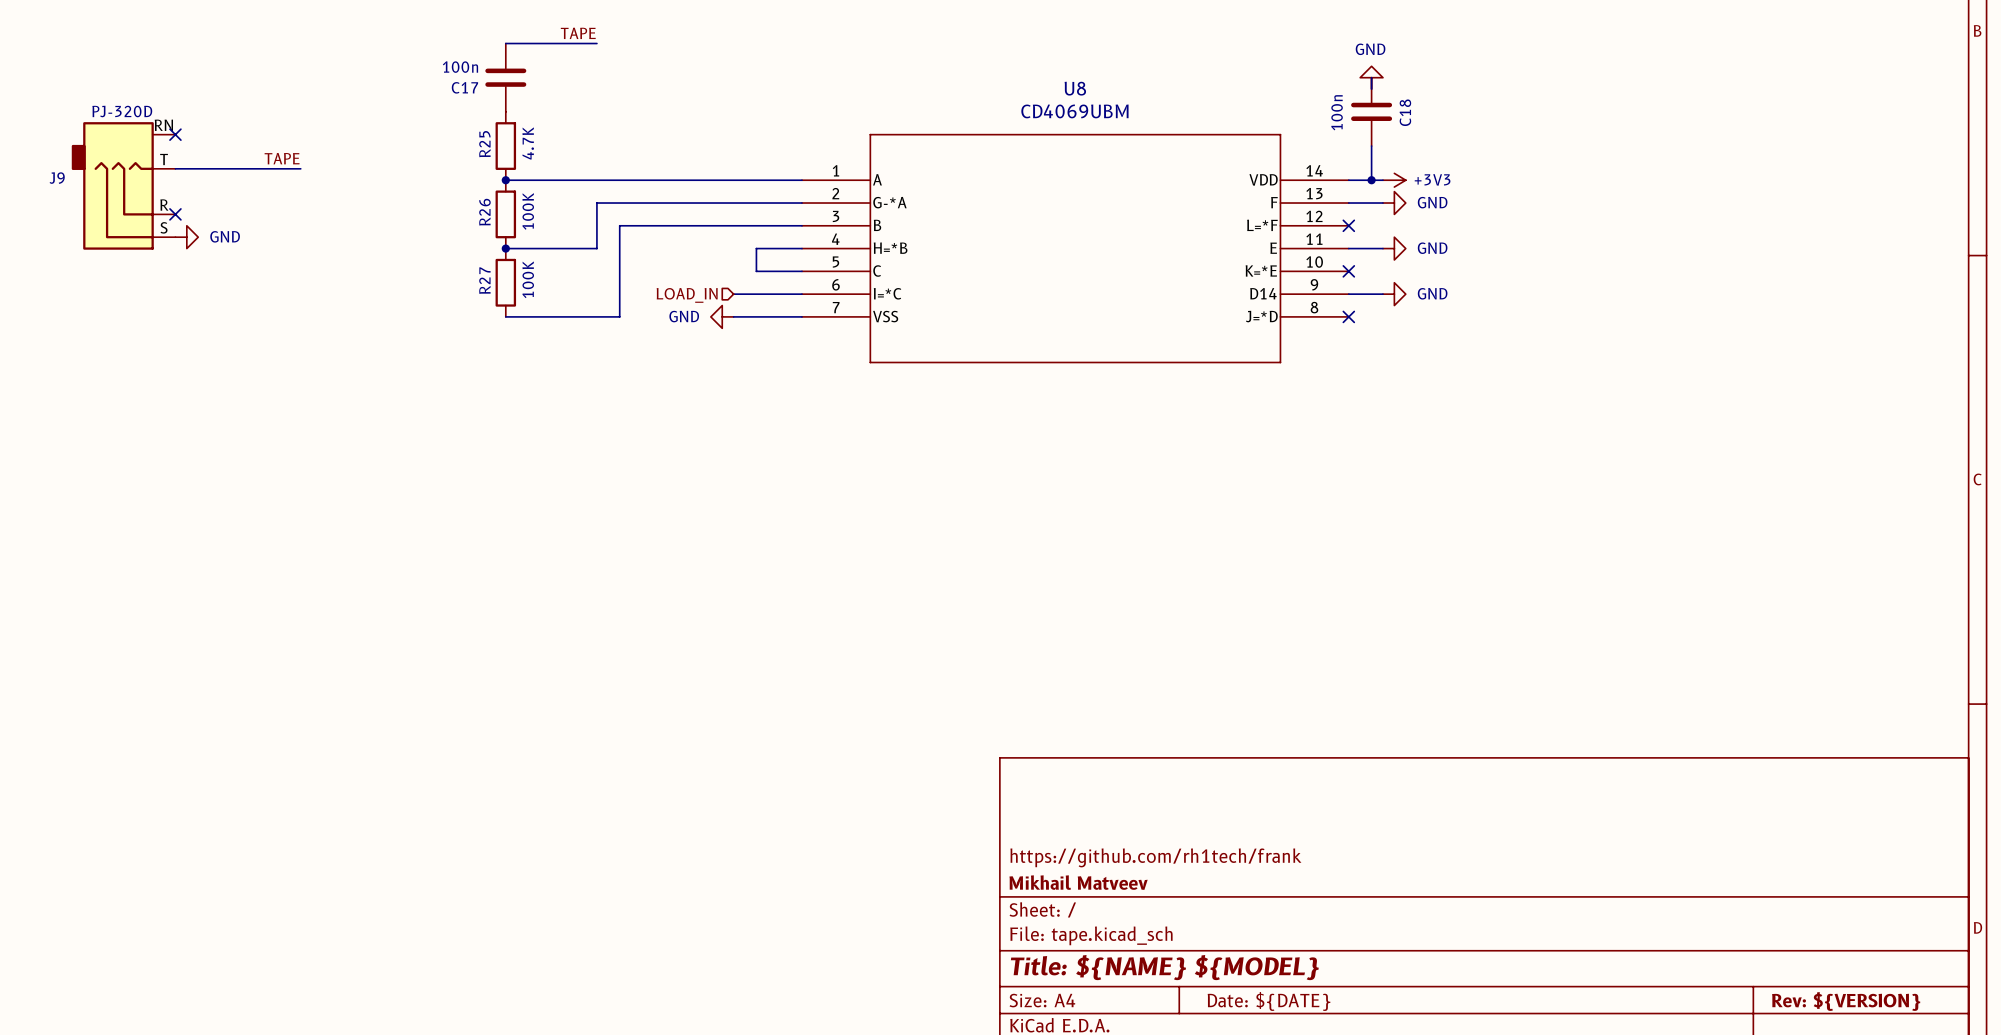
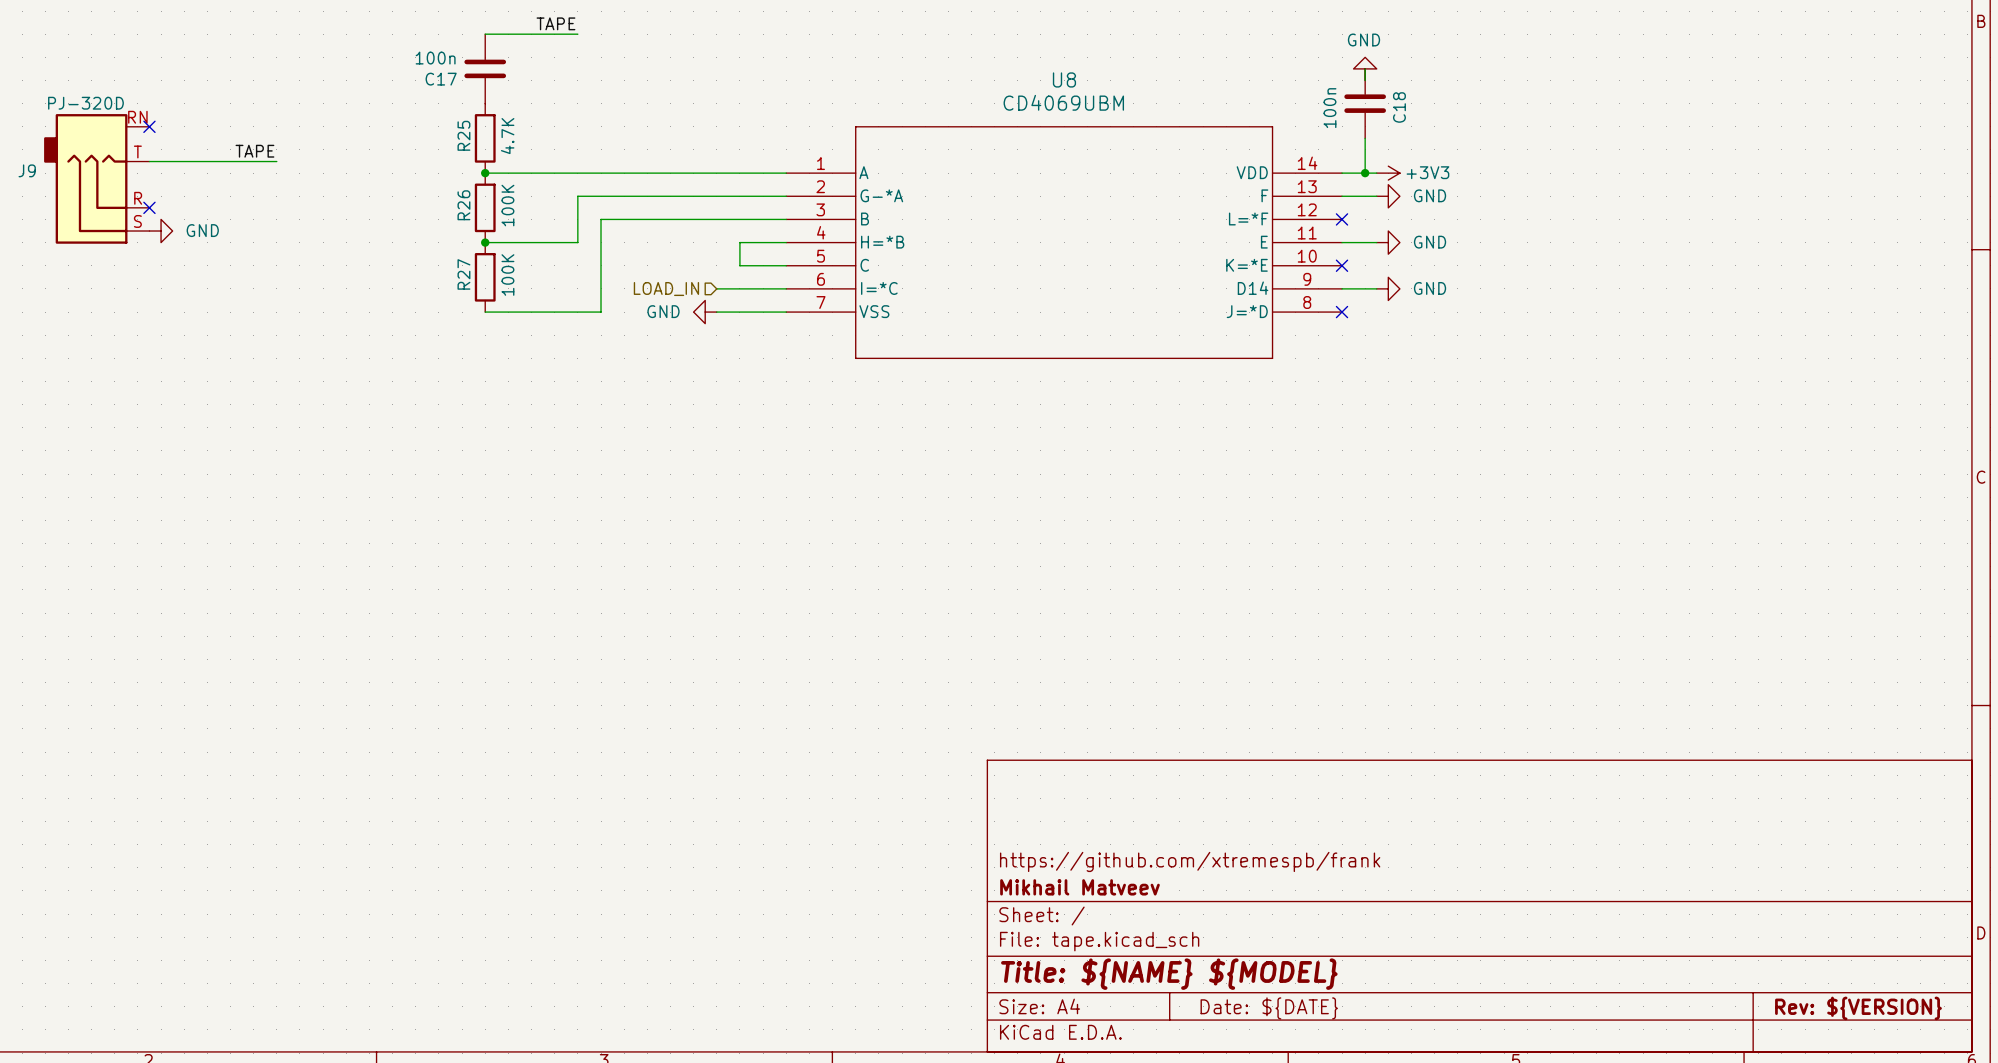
title block: https://github.com/rh1tech/frank (1155, 857) -> https://github.com/xtremespb/frank (1190, 861)

